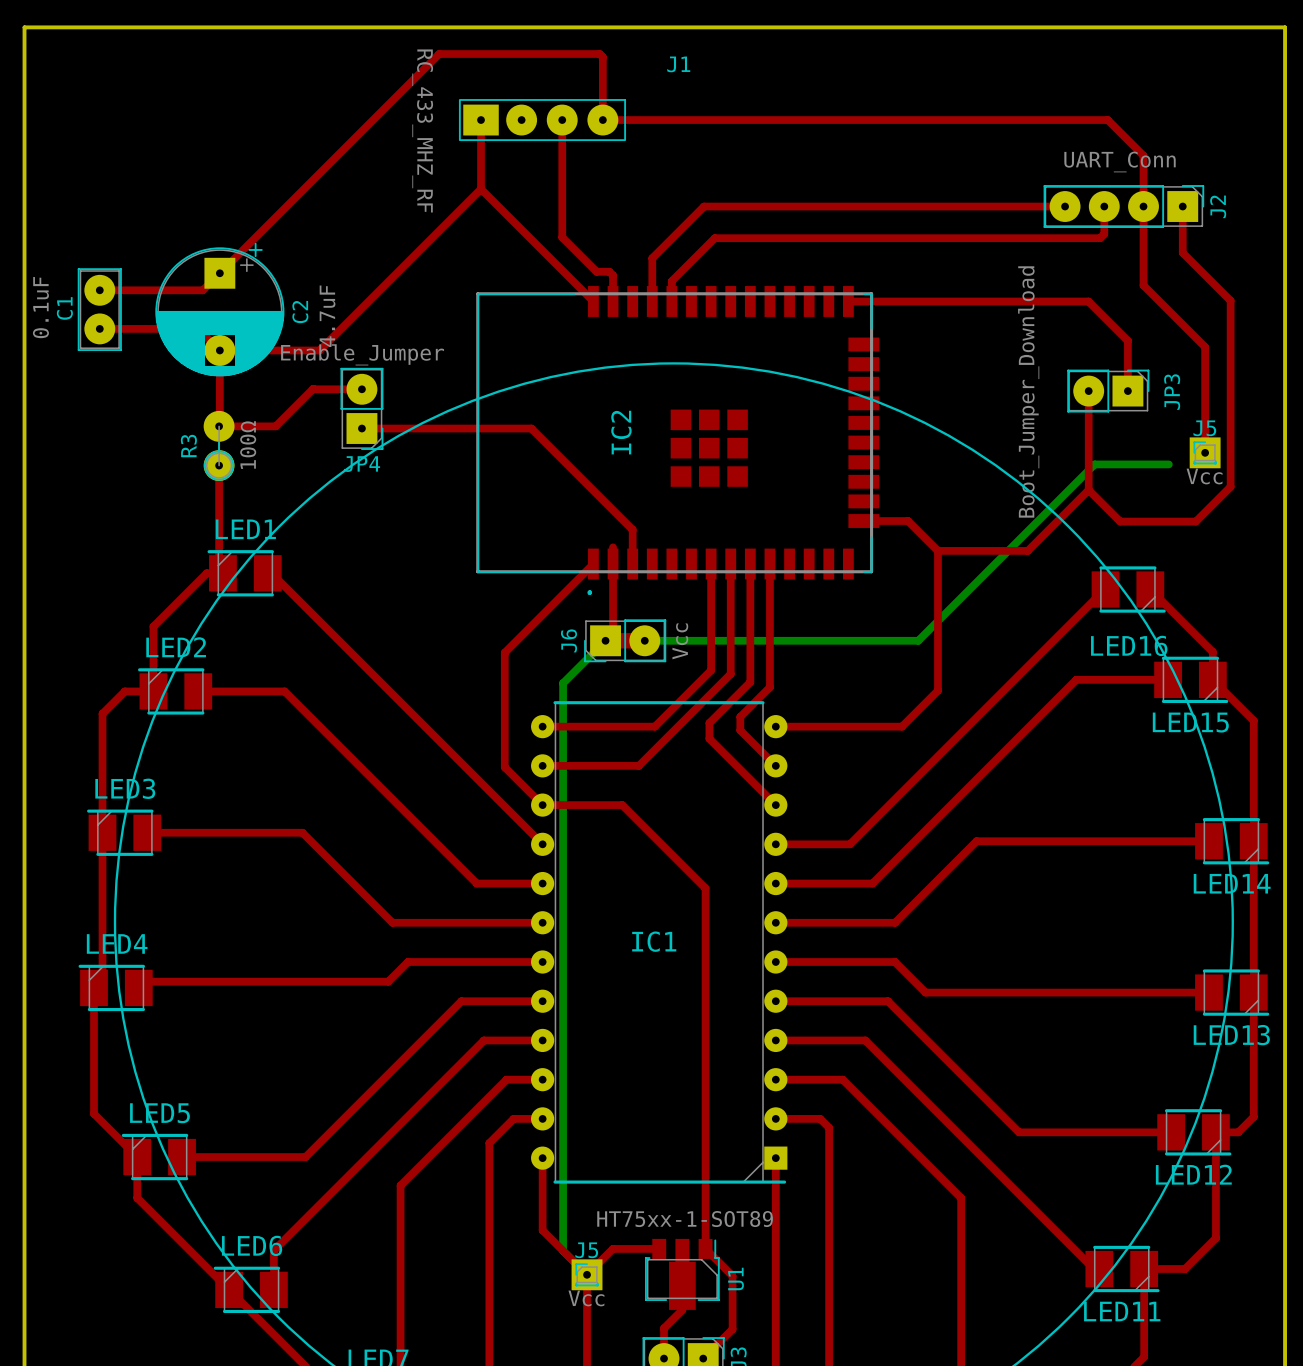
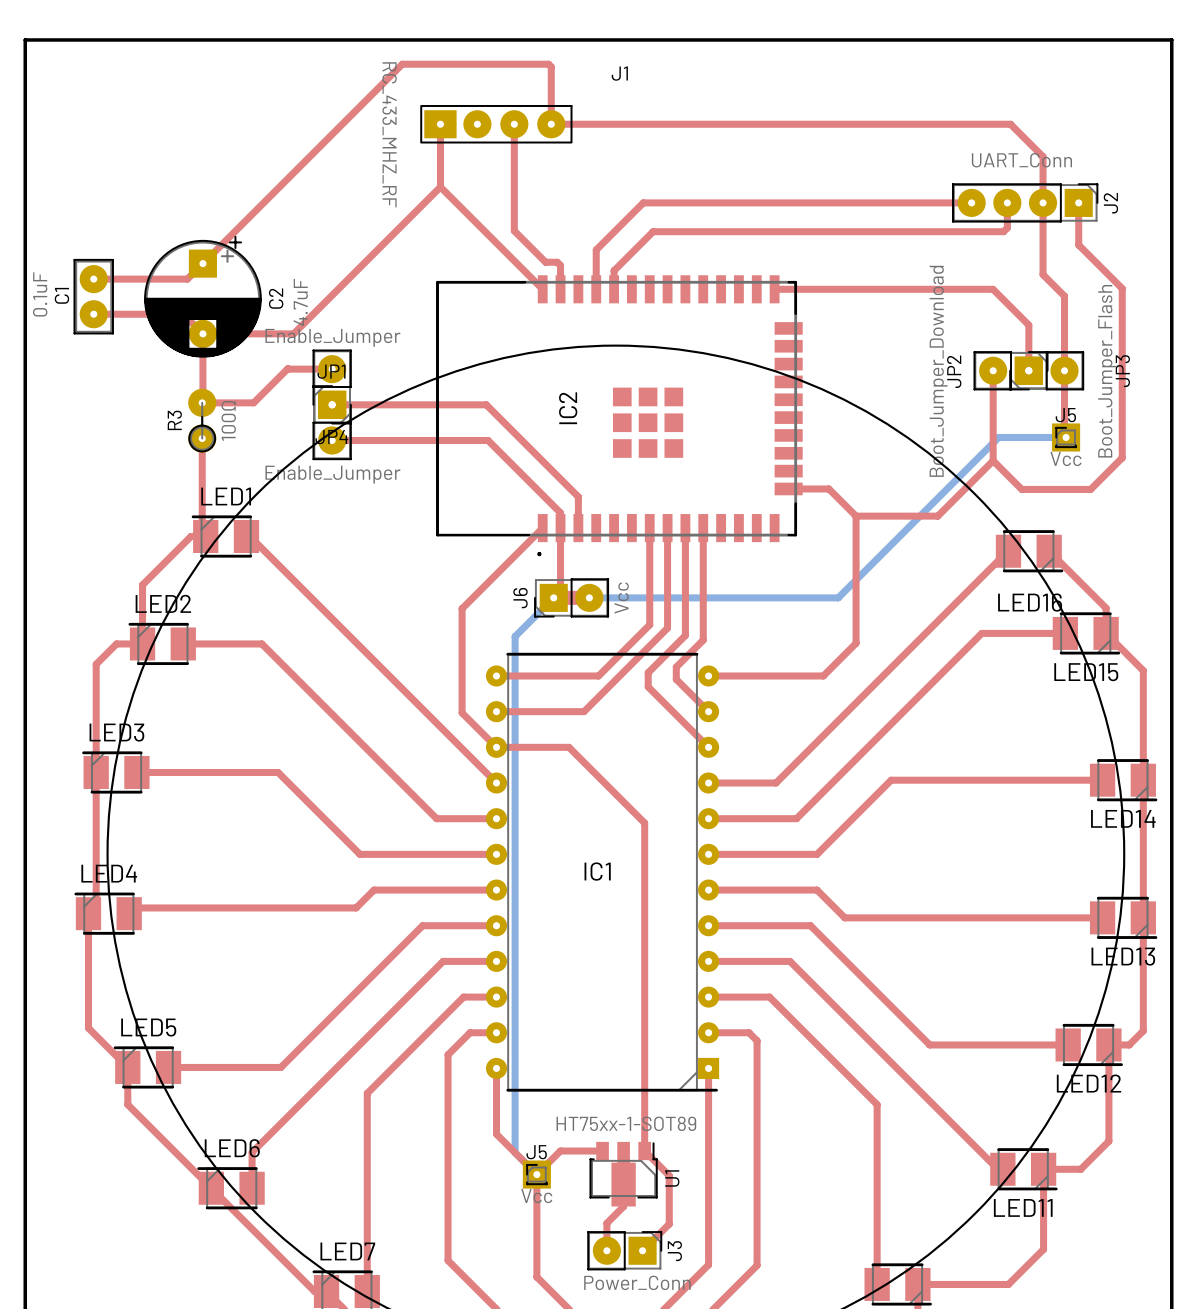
top track: (1167, 309) (1205, 347) (1205, 452) -> (1064, 296) (1064, 435) (1066, 437)
JP2: none -> Boot_Jumper_Flash (1046, 370)
JP3 name position: JP3 (1172, 392) -> JP3 (1122, 371)
JP1: none -> Enable_Jumper (332, 422)
J5 position: (1205, 452) -> (1066, 437)
top track: none -> (332, 440) (488, 440) (560, 512)

